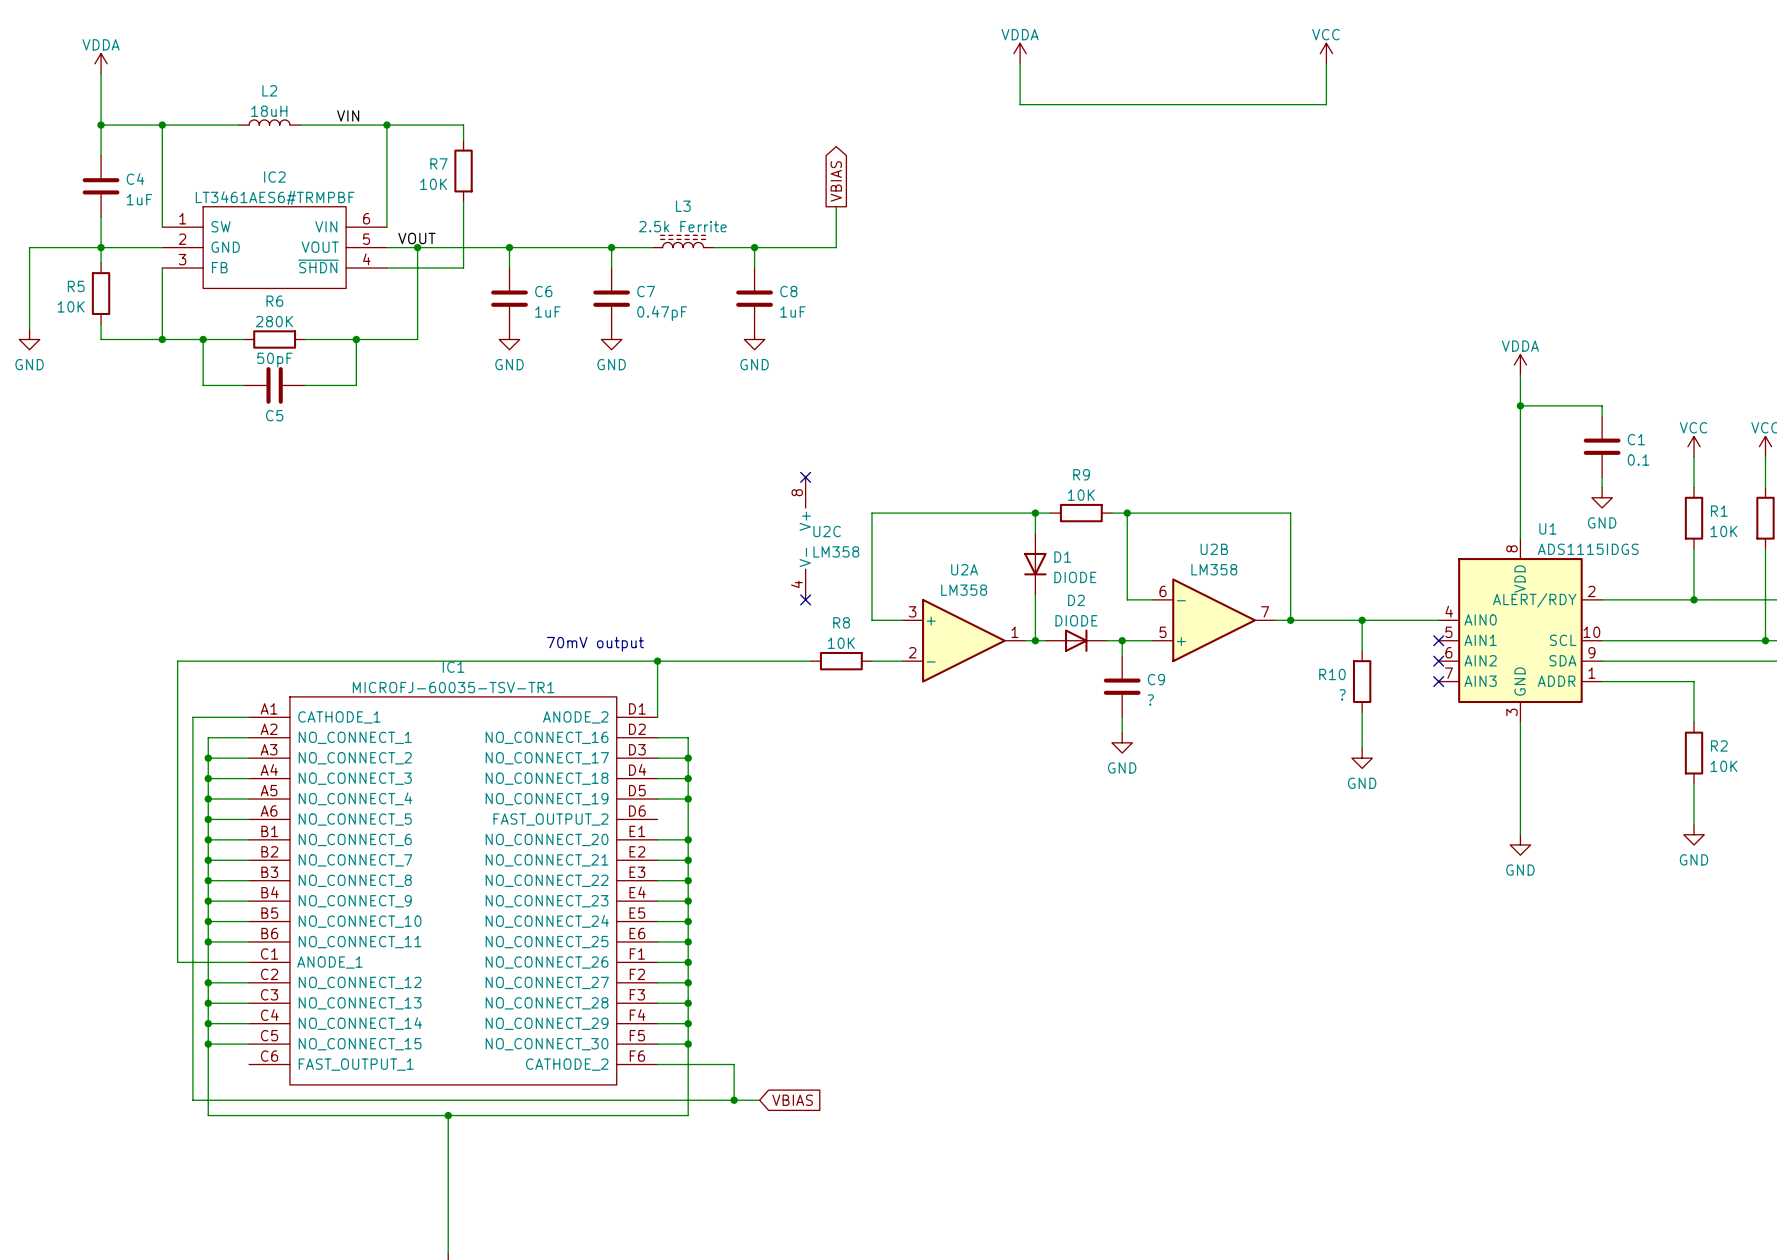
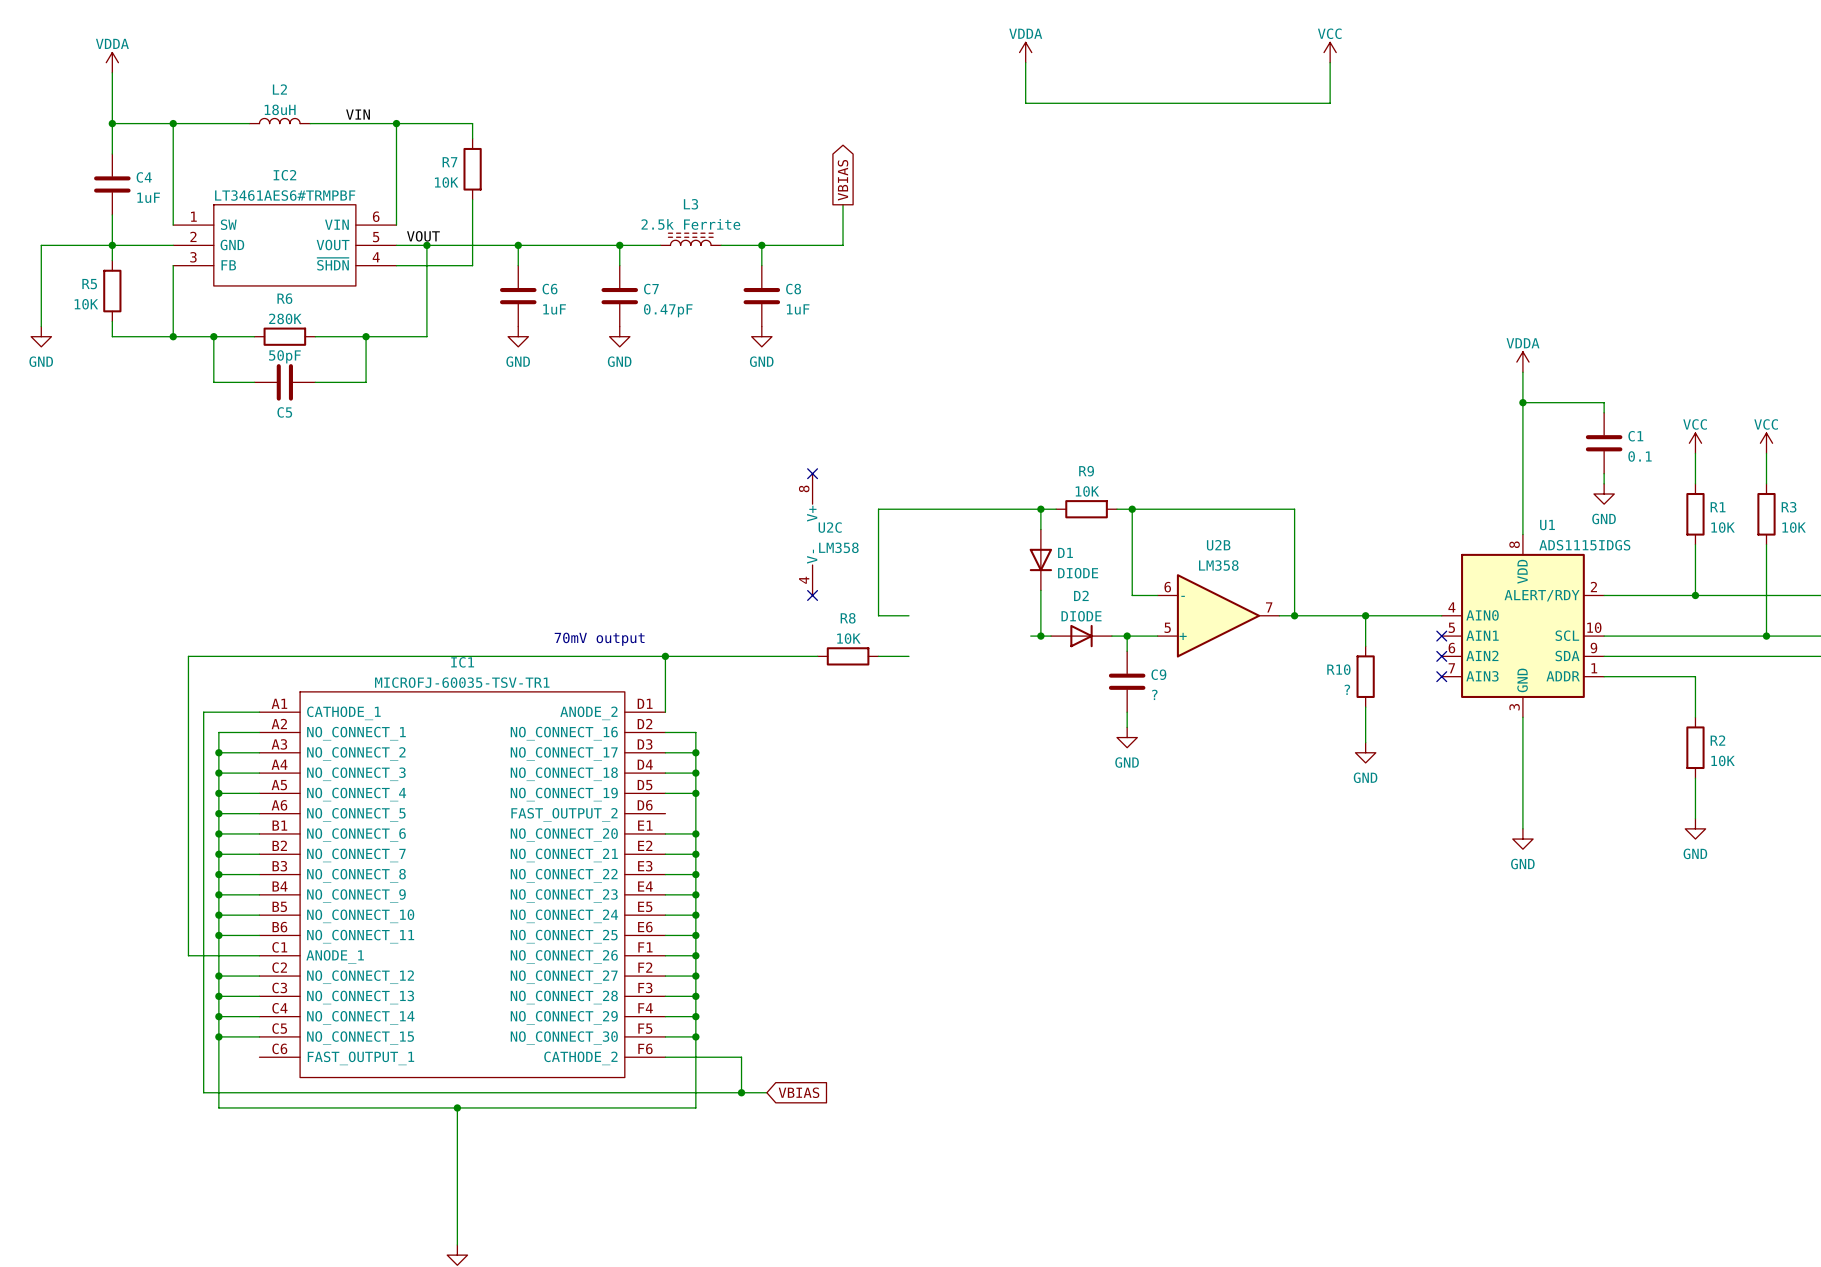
U2A: LM358 (963, 640) -> none

